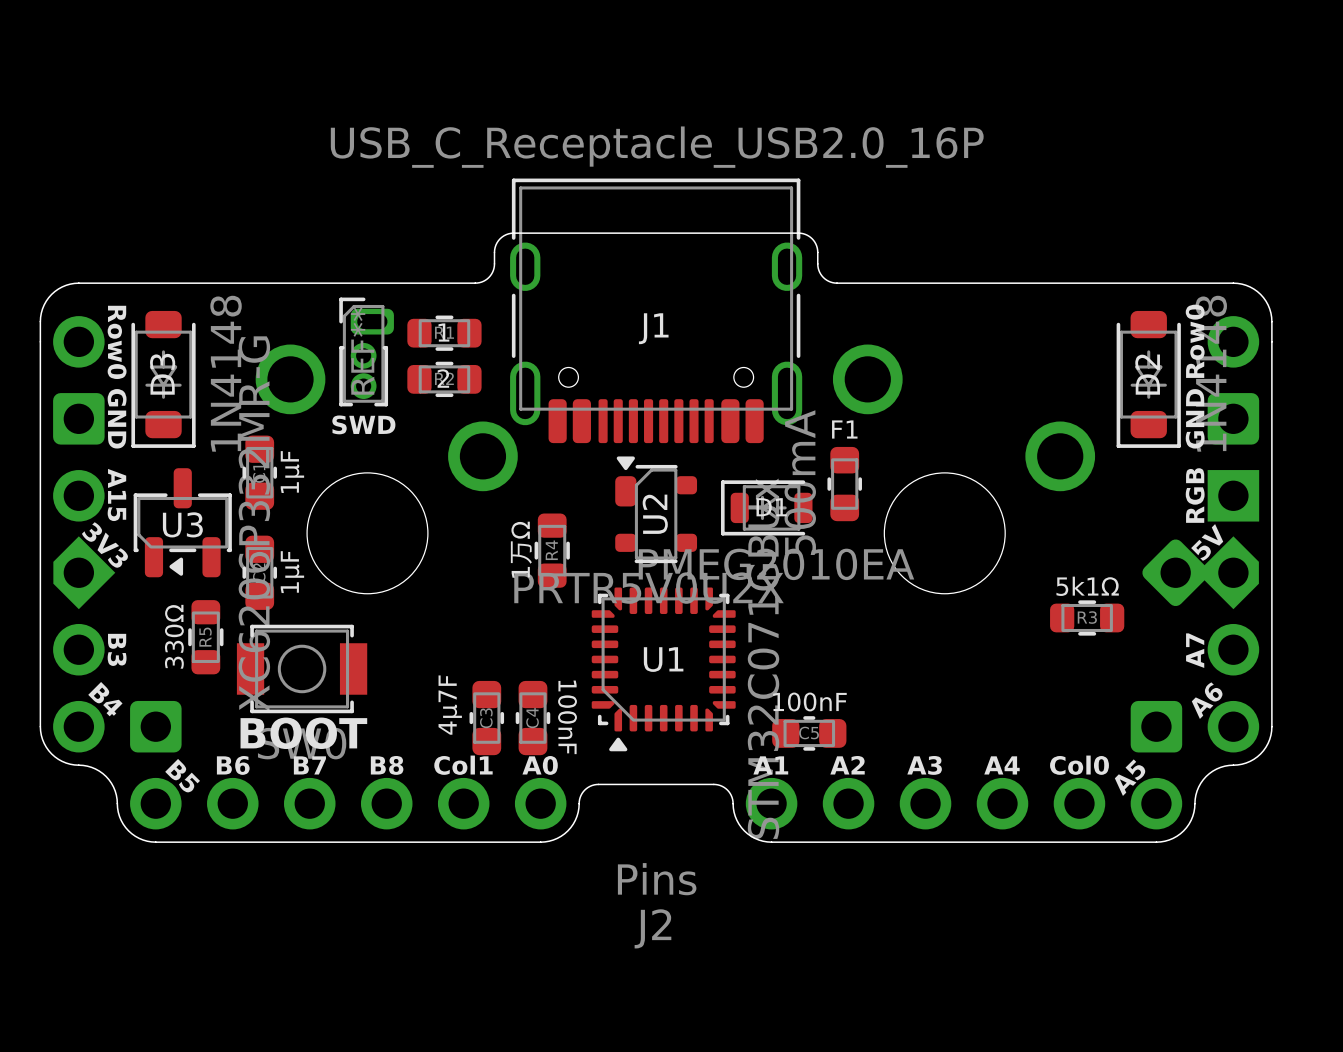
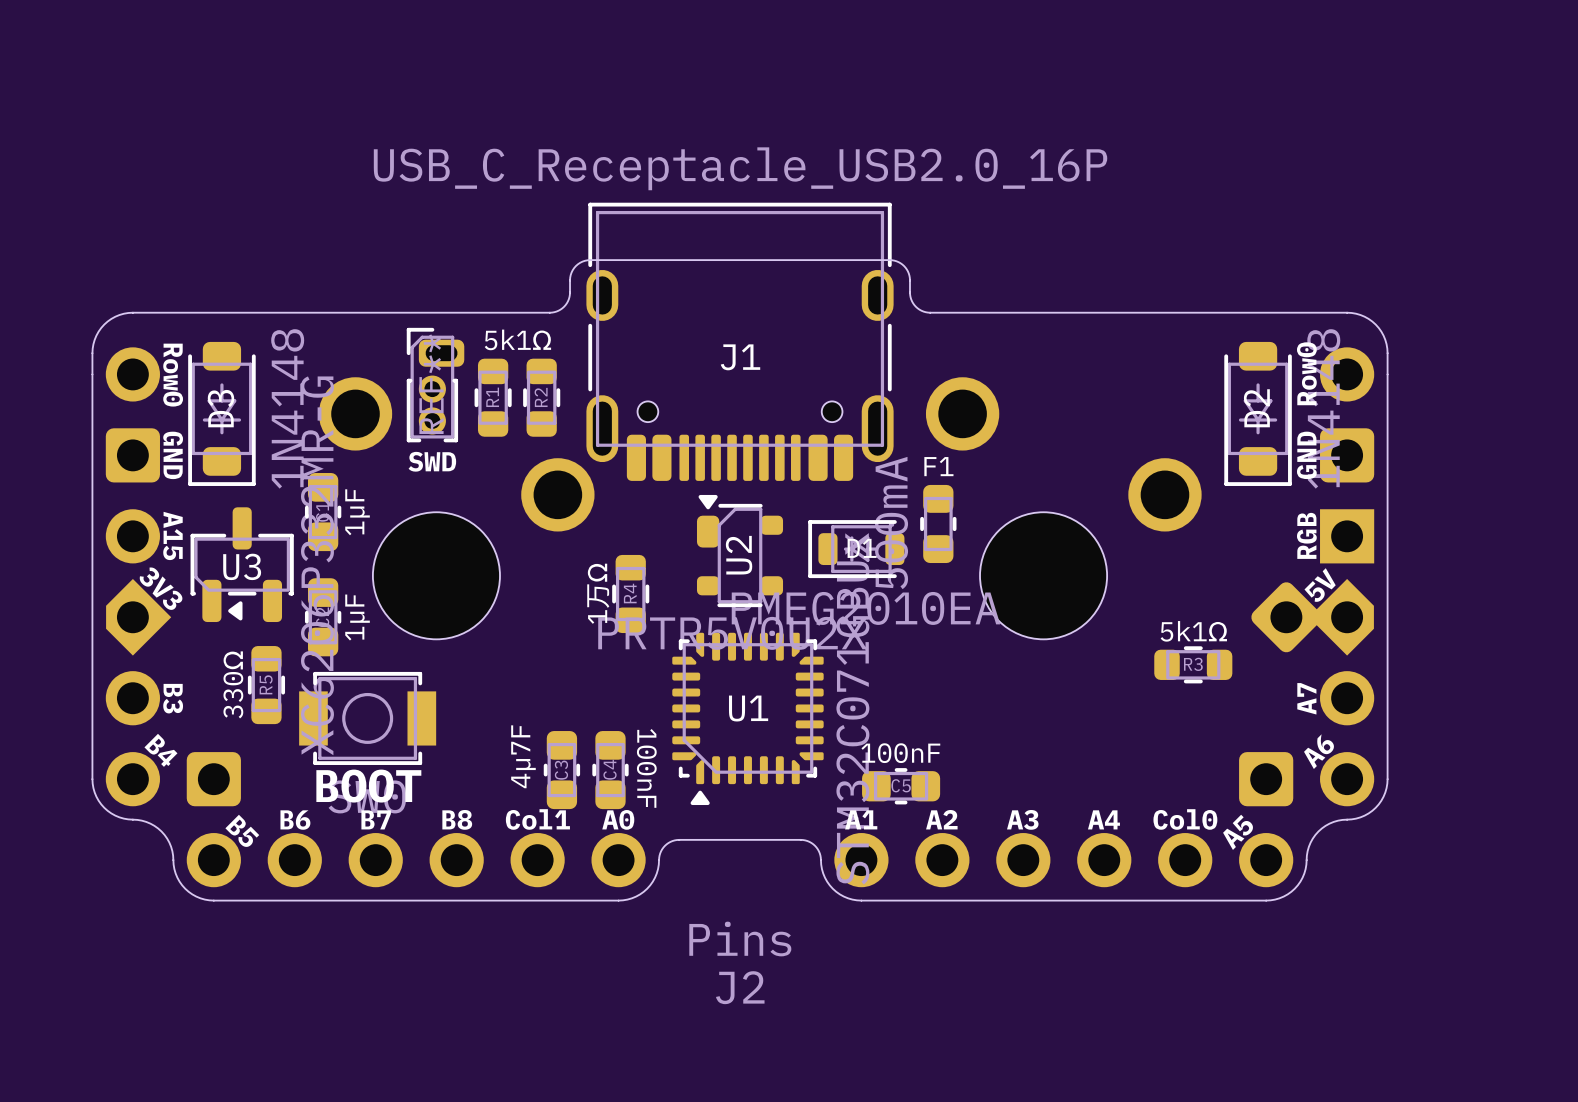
R1 value: none -> 5k1Ω (517, 339)
R1 text: 1 (443, 332) -> none
R1 rotation: 0° (444, 333) -> 90° clockwise (493, 397)
R2 text: 2 (443, 378) -> none
R2 rotation: 0° (444, 379) -> 90° clockwise (541, 397)

